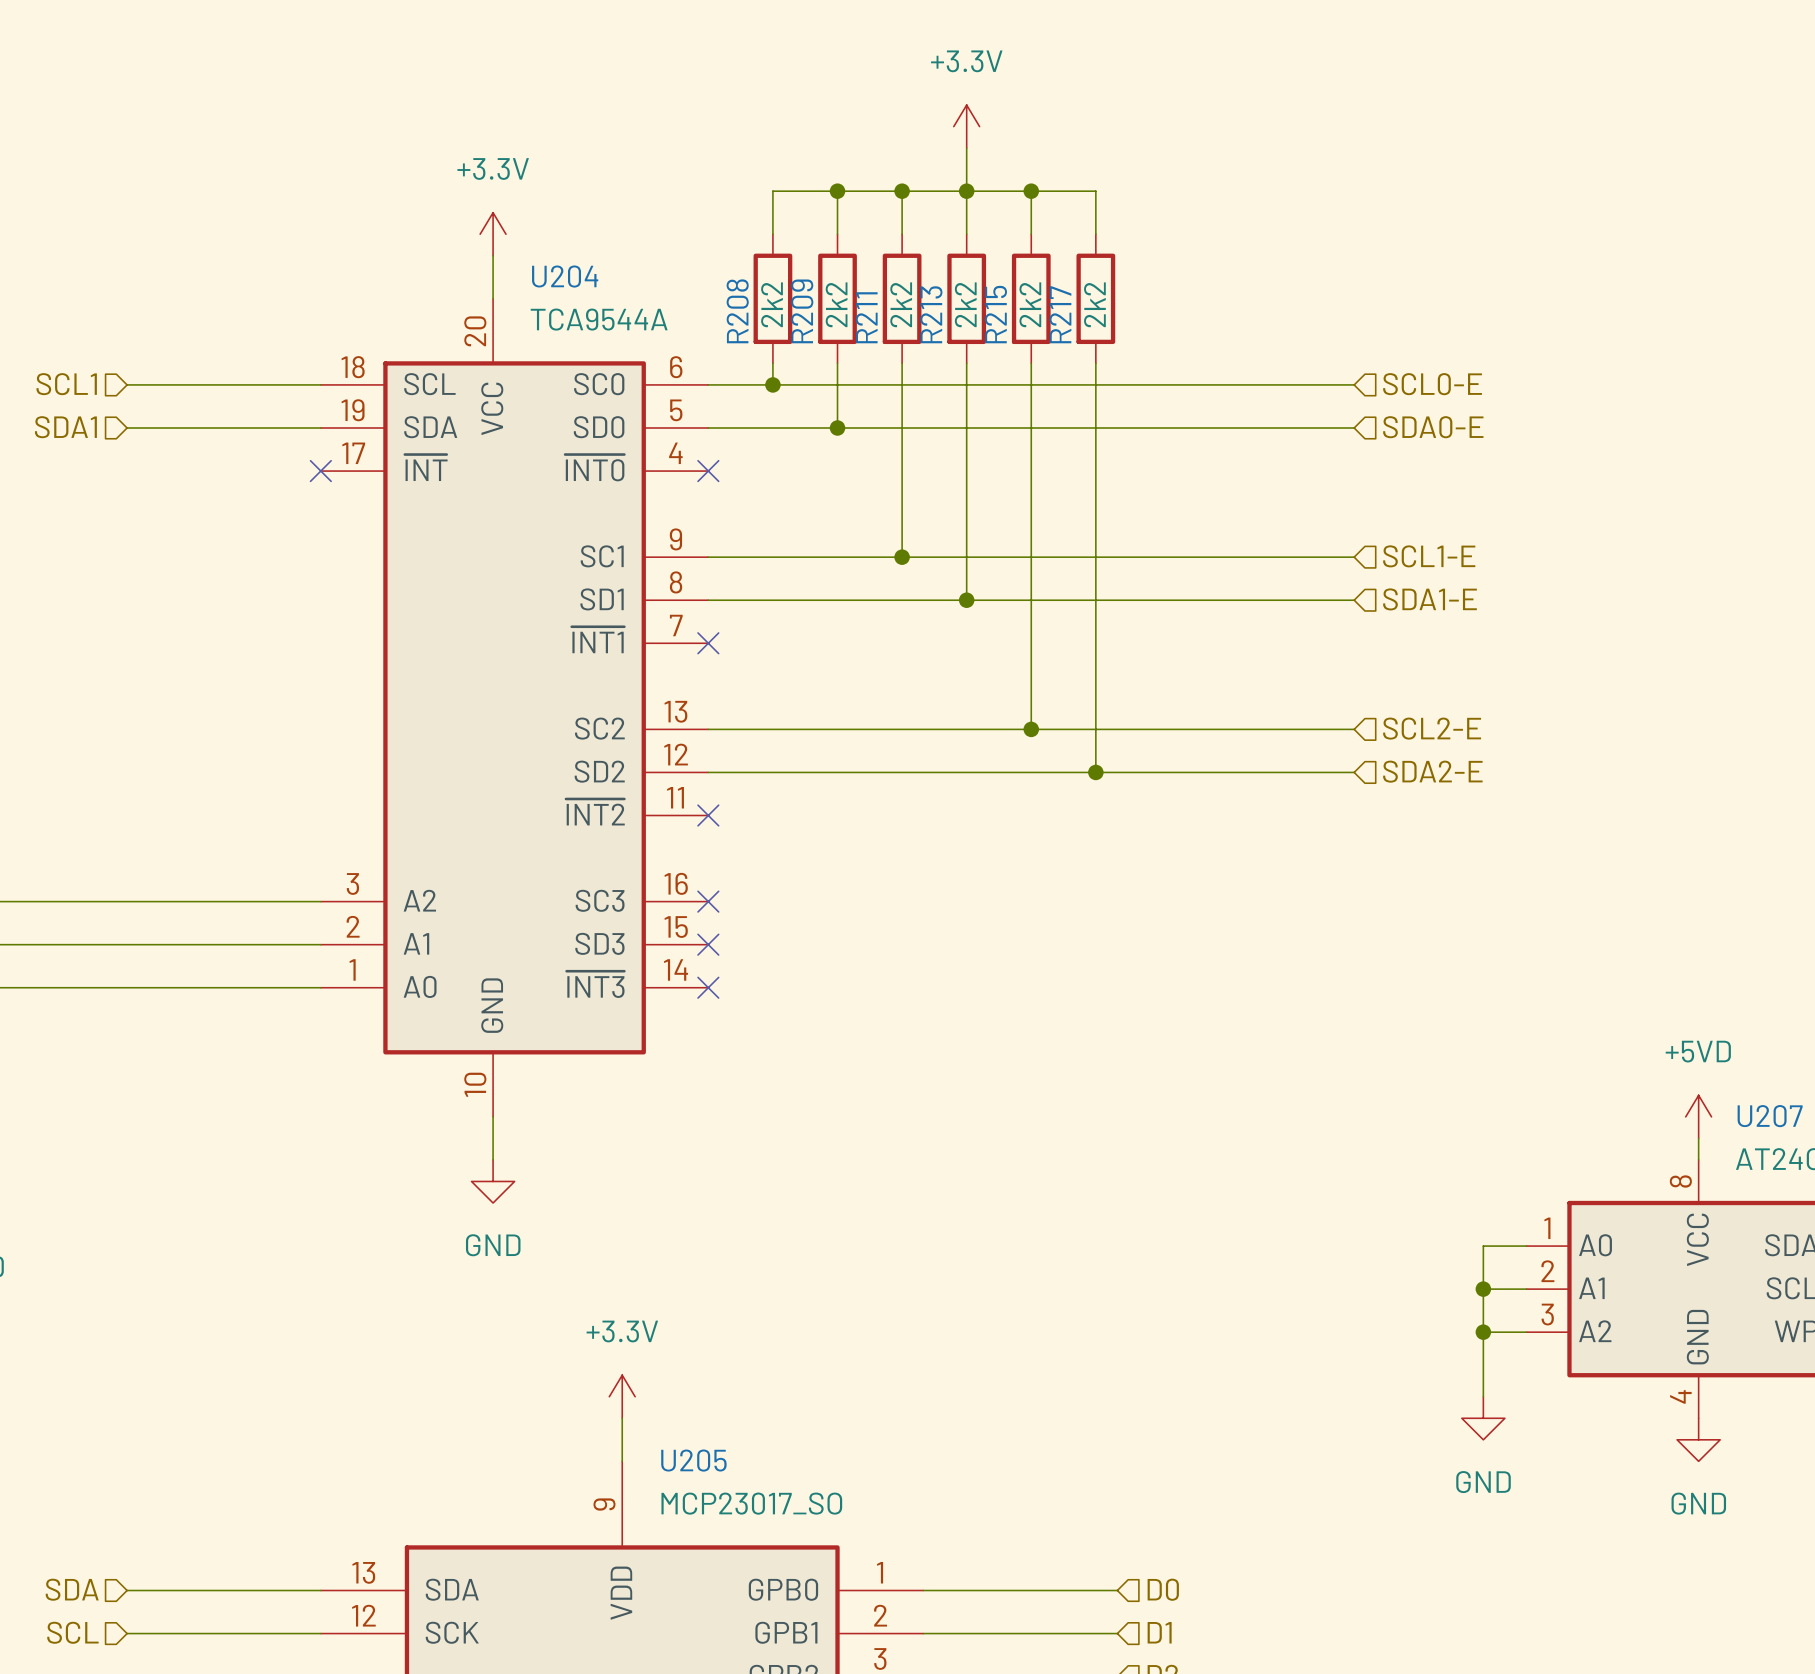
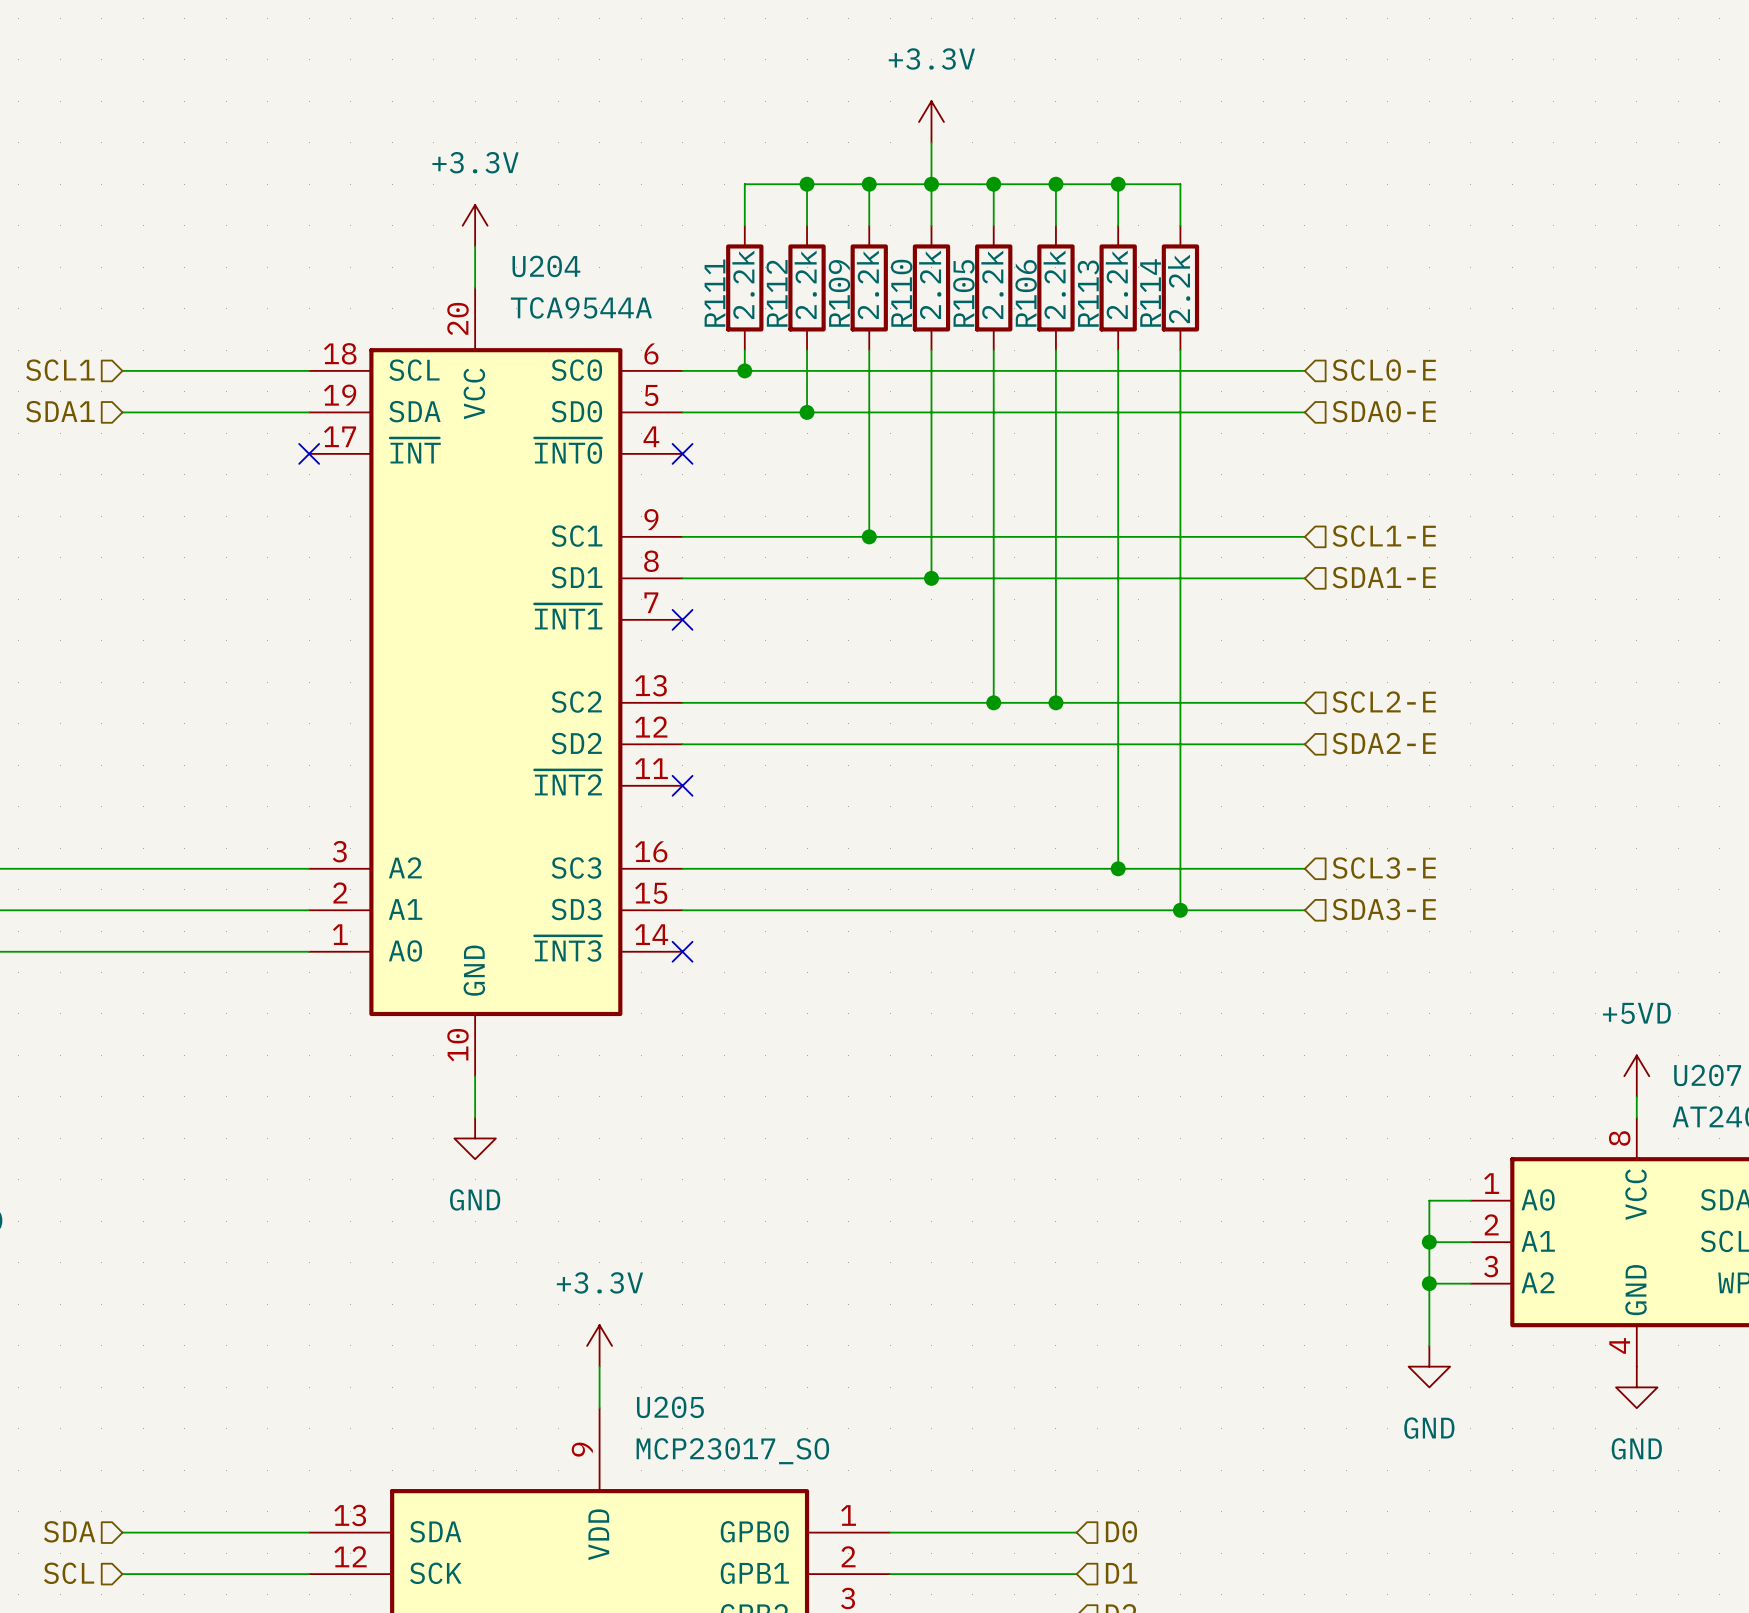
wire: none -> (1055, 184) (1180, 184) (1180, 225)
junction: none -> (1055, 184)
wire: none -> (1118, 184) (1118, 225)
junction: none -> (1118, 184)
R113: none -> 2.2k (1118, 287)
R114: none -> 2.2k (1180, 287)
R208 value: 2k2 (772, 304) -> 2.2k (743, 284)
R209 value: 2k2 (836, 304) -> 2.2k (805, 284)
R211 value: 2k2 (901, 304) -> 2.2k (867, 284)
R213 value: 2k2 (965, 304) -> 2.2k (930, 284)
R215 value: 2k2 (1030, 304) -> 2.2k (992, 284)
R217 value: 2k2 (1094, 304) -> 2.2k (1054, 284)
R208 name: R208 (737, 311) -> R111 (714, 293)
R209 name: R209 (802, 311) -> R112 (777, 293)
R213 name: R213 (931, 314) -> R110 (901, 293)
R215 name: R215 (996, 314) -> R105 (963, 293)
R217 name: R217 (1060, 314) -> R106 (1026, 293)
R211 name: R211 (866, 317) -> R109 (839, 293)
wire: none -> (1118, 350) (1118, 868)
wire: none -> (1180, 350) (1180, 910)
wire: (1095, 729) (1095, 772) -> none
junction position: (1095, 772) -> (1055, 702)
hierarchical label: none -> SCL3-E (1384, 868)
wire: none -> (682, 868) (1304, 868)
no-connect mark: (708, 901) -> none
junction: none -> (1118, 868)
hierarchical label: none -> SDA3-E (1384, 909)
wire: none -> (682, 910) (1304, 910)
no-connect mark: (708, 944) -> none
junction: none -> (1180, 910)

